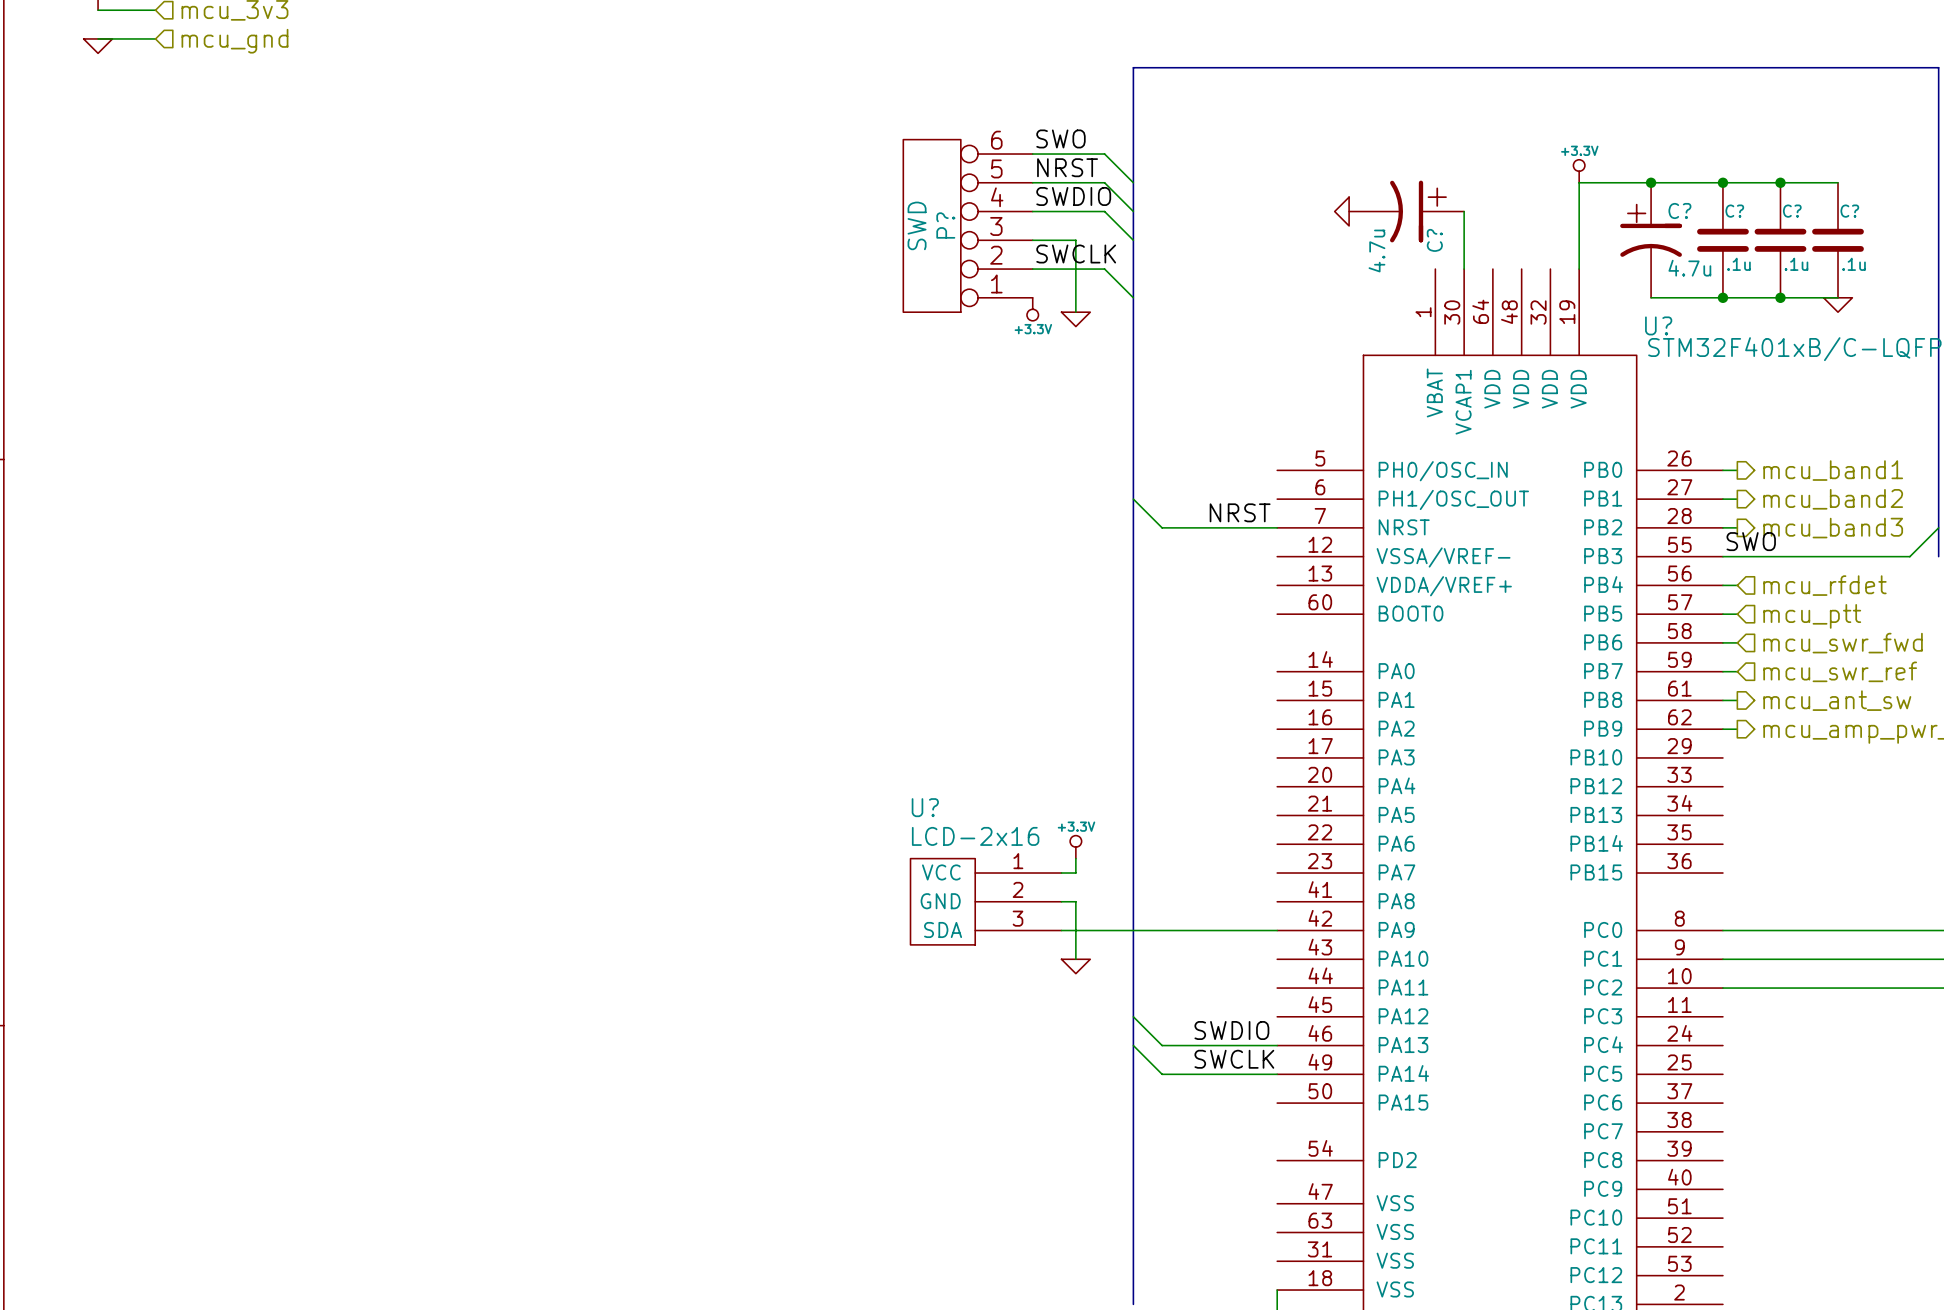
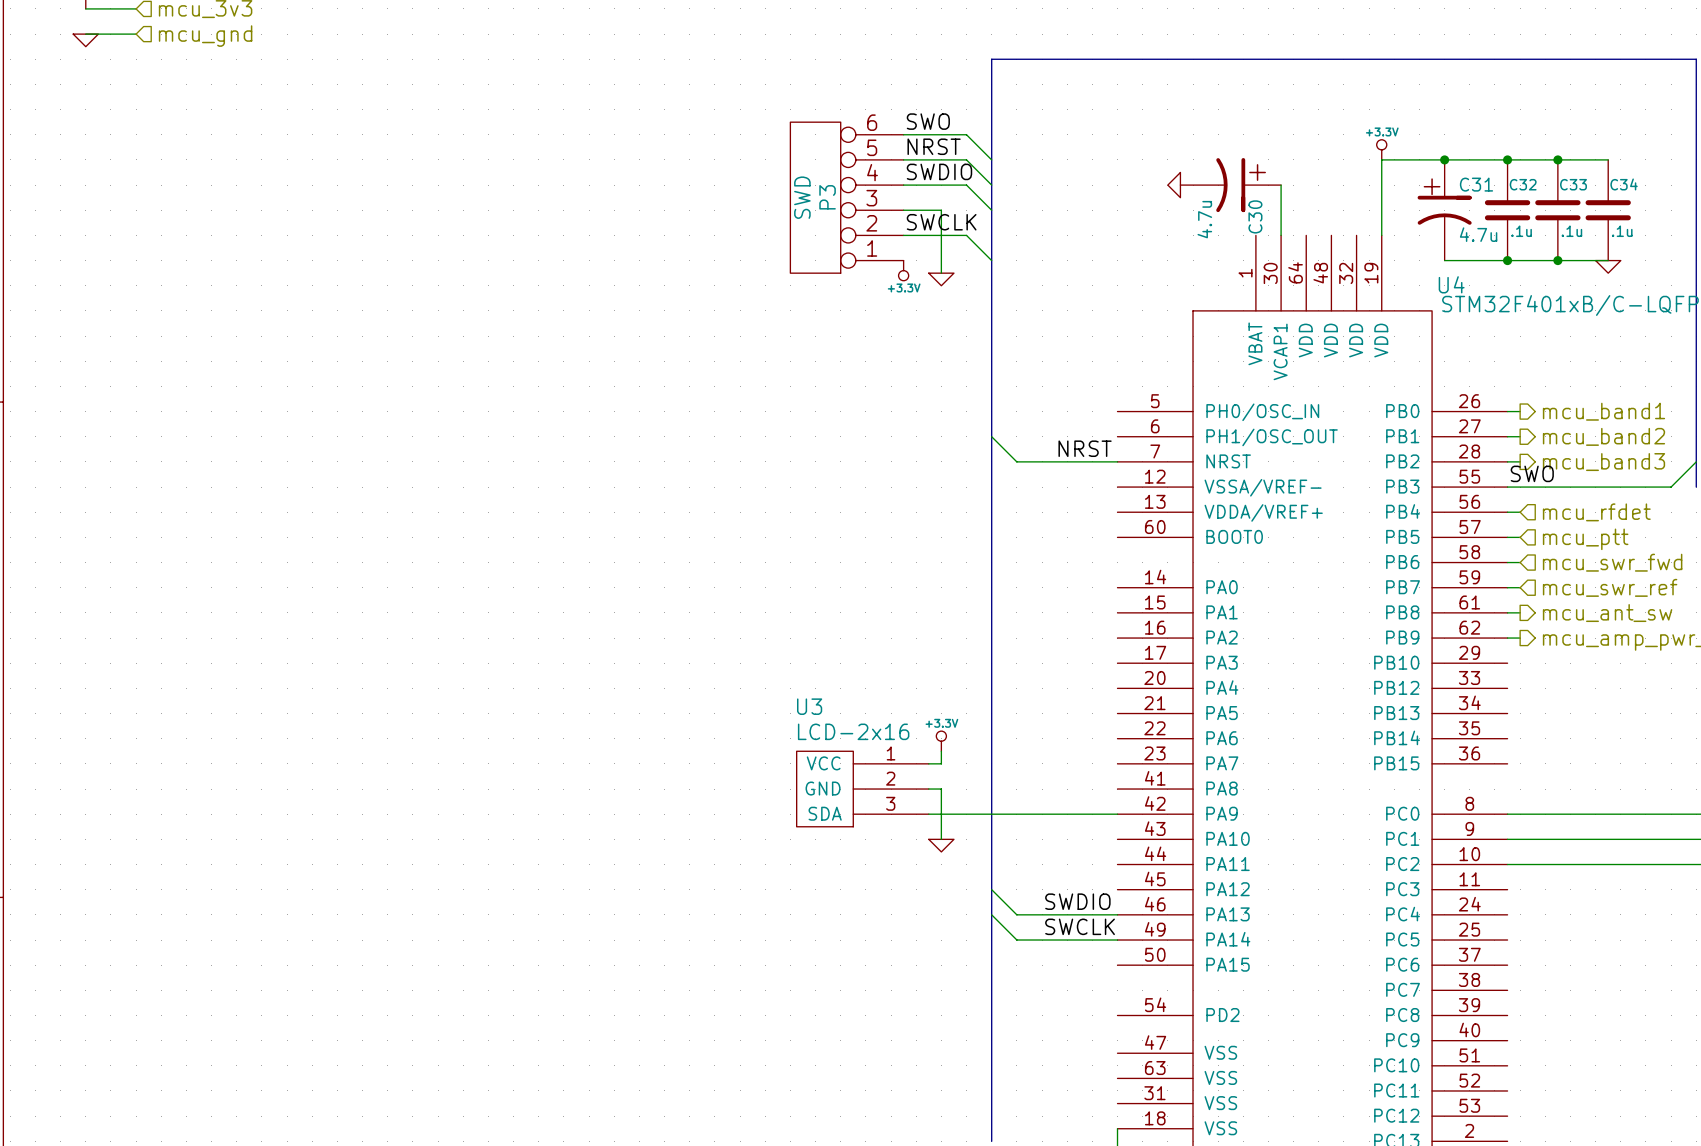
C? name: C? (1679, 210) -> C31 (1476, 184)
C? name: C? (1734, 211) -> C32 (1523, 184)
C? name: C? (1792, 211) -> C33 (1573, 184)
C? name: C? (1849, 211) -> C34 (1624, 184)
P? name: P? (945, 225) -> P3 (827, 197)
C? name: C? (1434, 240) -> C30 (1255, 216)
U? name: U? (1658, 325) -> U4 (1451, 284)
U? name: U? (925, 807) -> U3 (809, 706)

